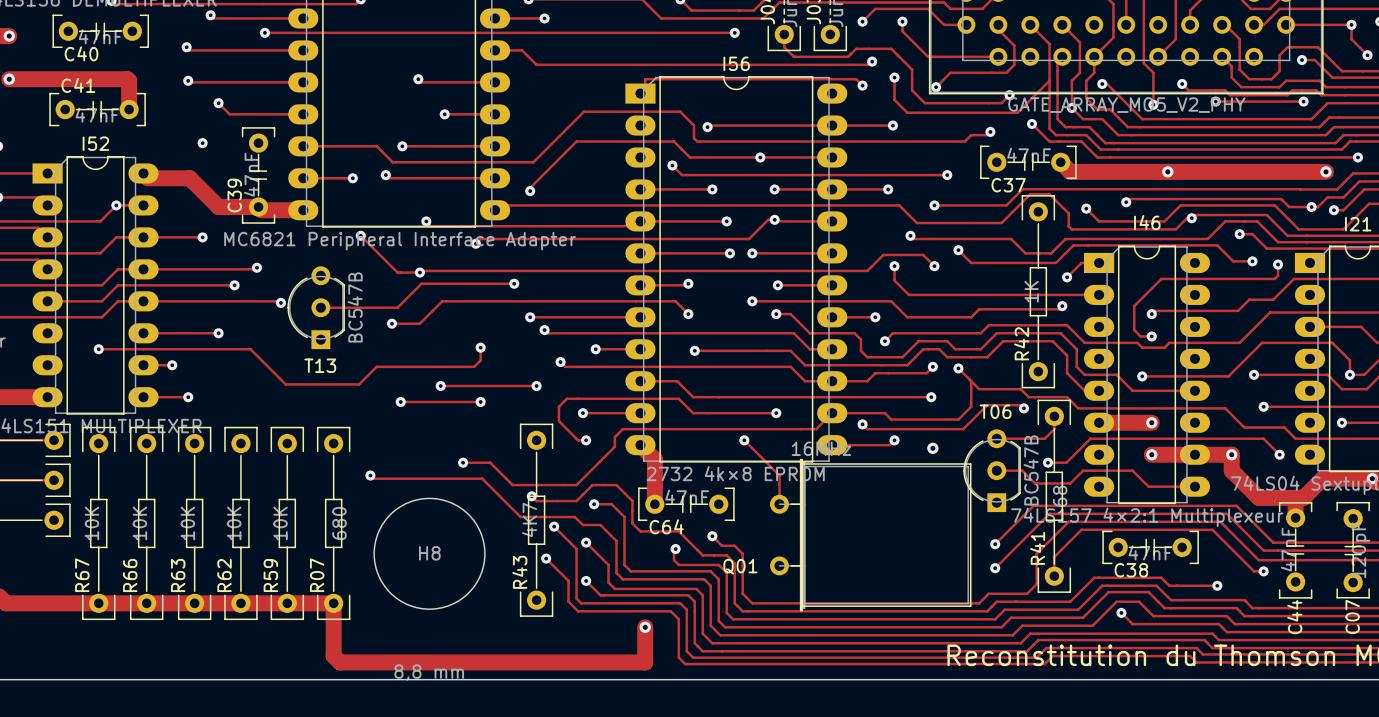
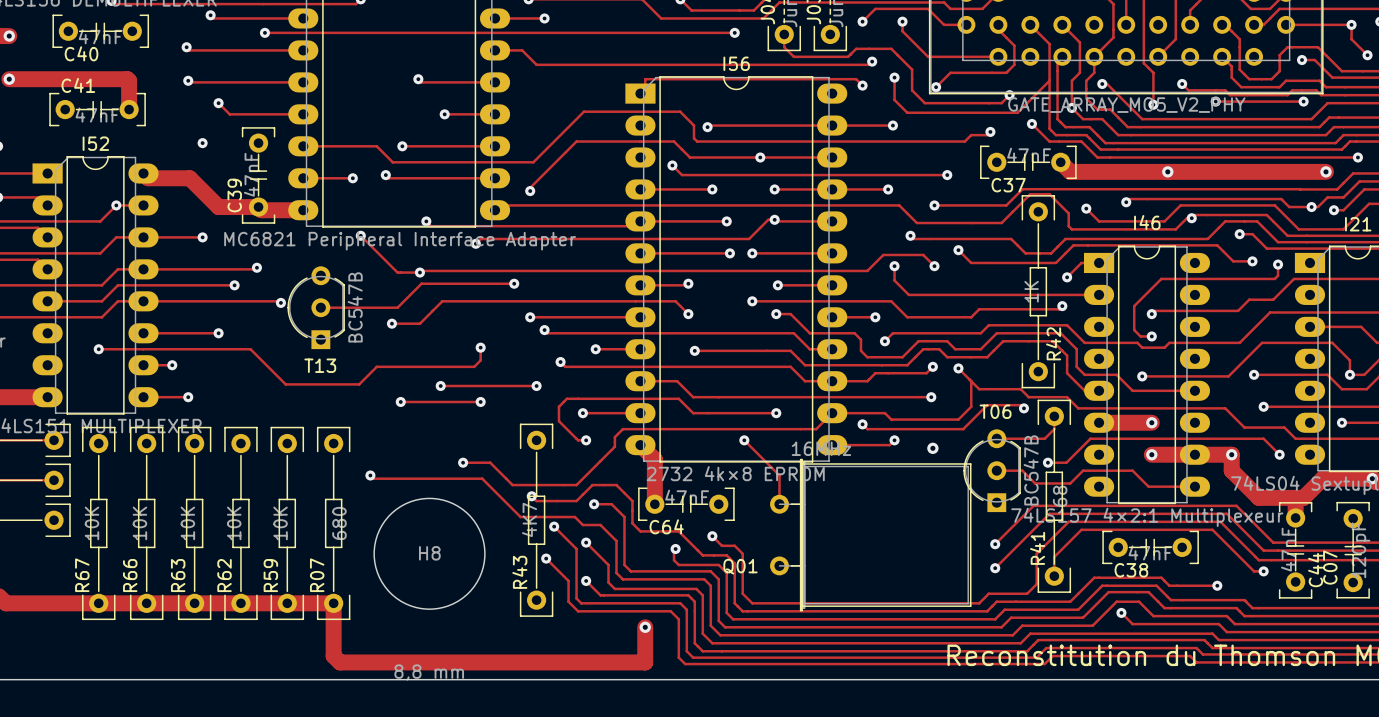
R42 name position: R42 (1021, 343) -> R42 (1053, 343)
C07 name position: C07 (1352, 616) -> C07 (1330, 567)
C44 name position: C44 (1294, 617) -> C44 (1315, 570)

